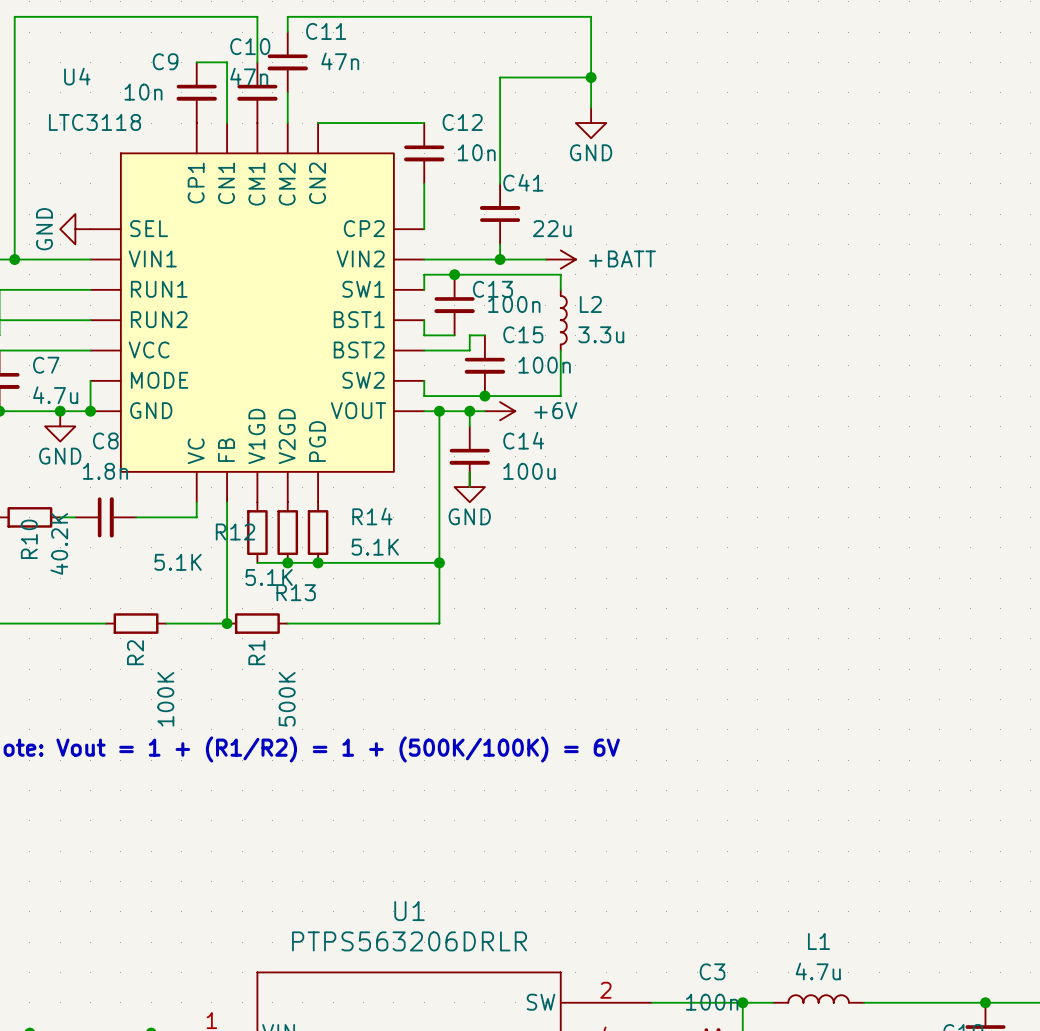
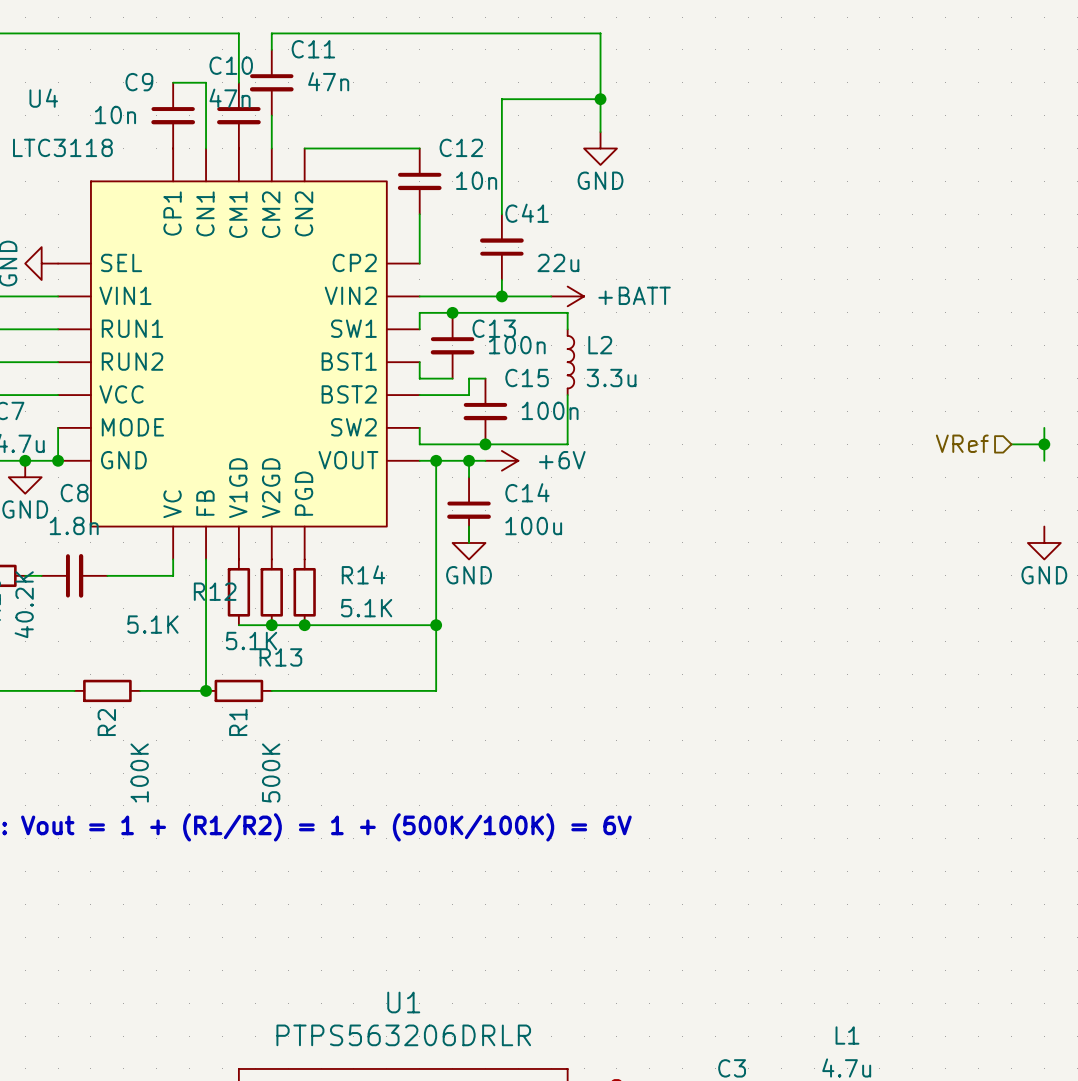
wire: none -> (1044, 427) (1044, 460)
hierarchical label: none -> VRef (962, 443)
wire: none -> (1011, 444) (1044, 444)
junction: none -> (1044, 444)
power symbol: none -> GND (1044, 542)

